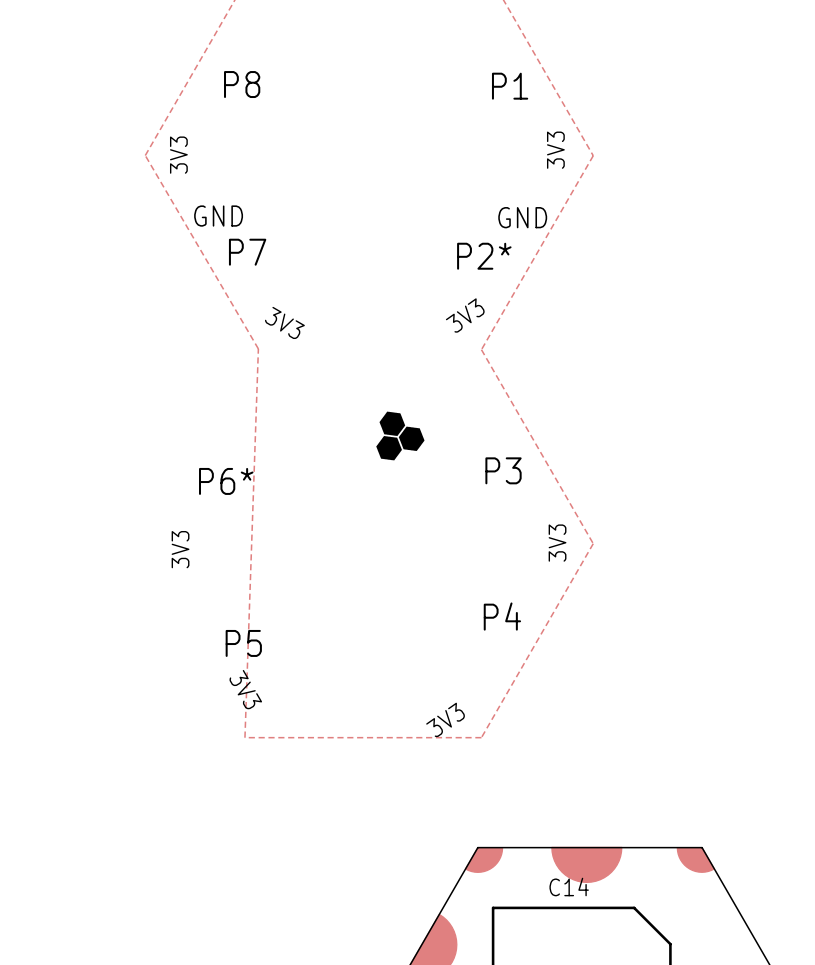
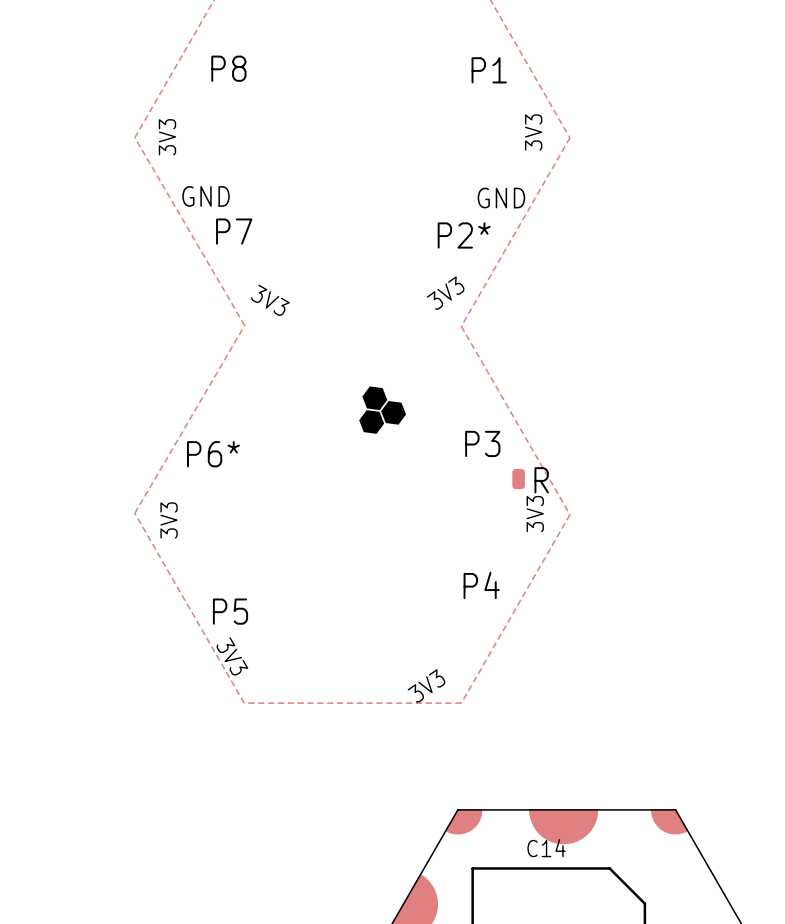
zone outline: (258, 348) (244, 737) (257, 737) -> (244, 325) (134, 513) (244, 703)
R: none -> (518, 479)

